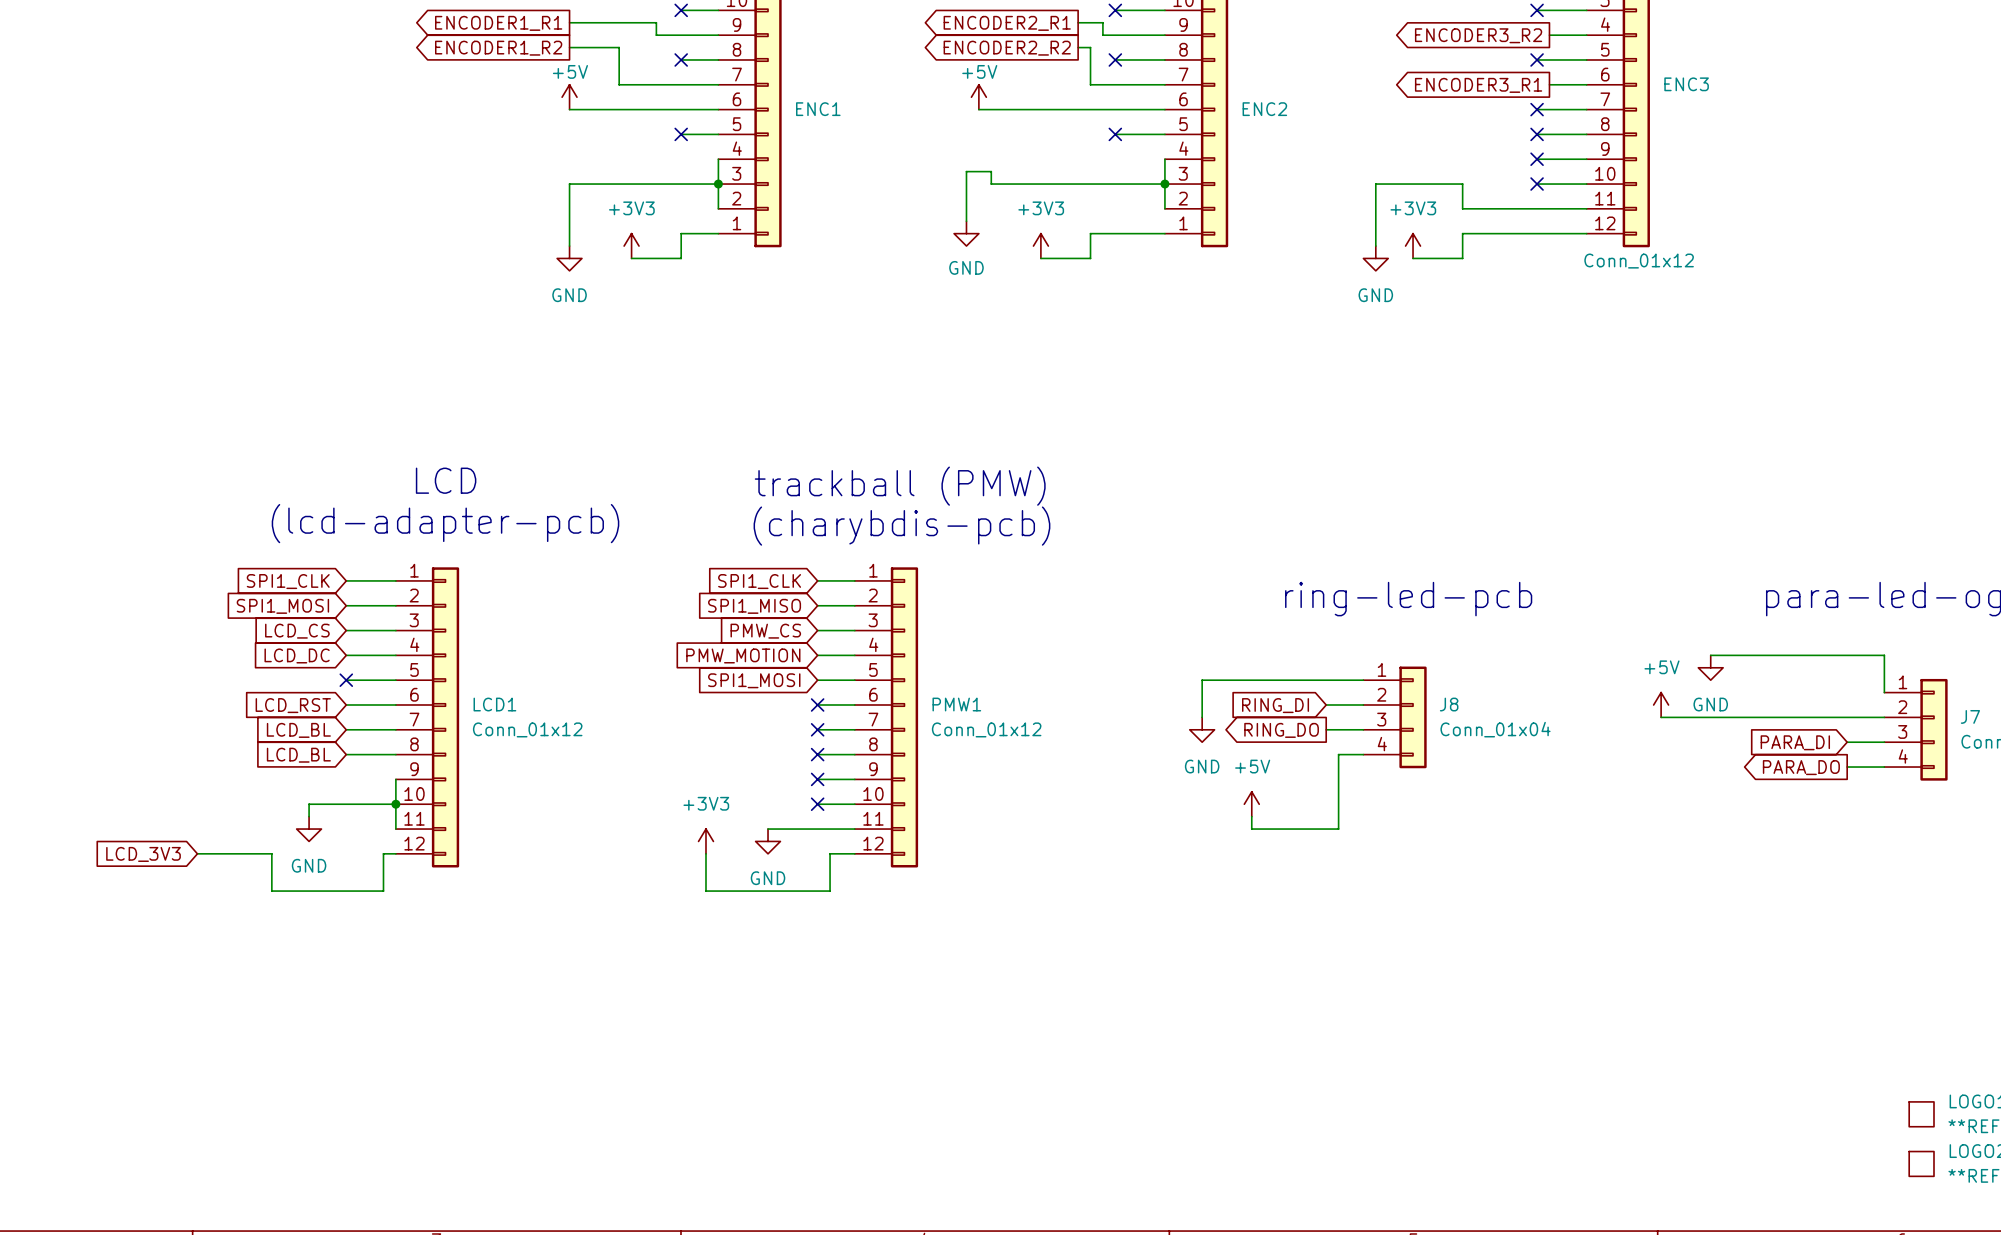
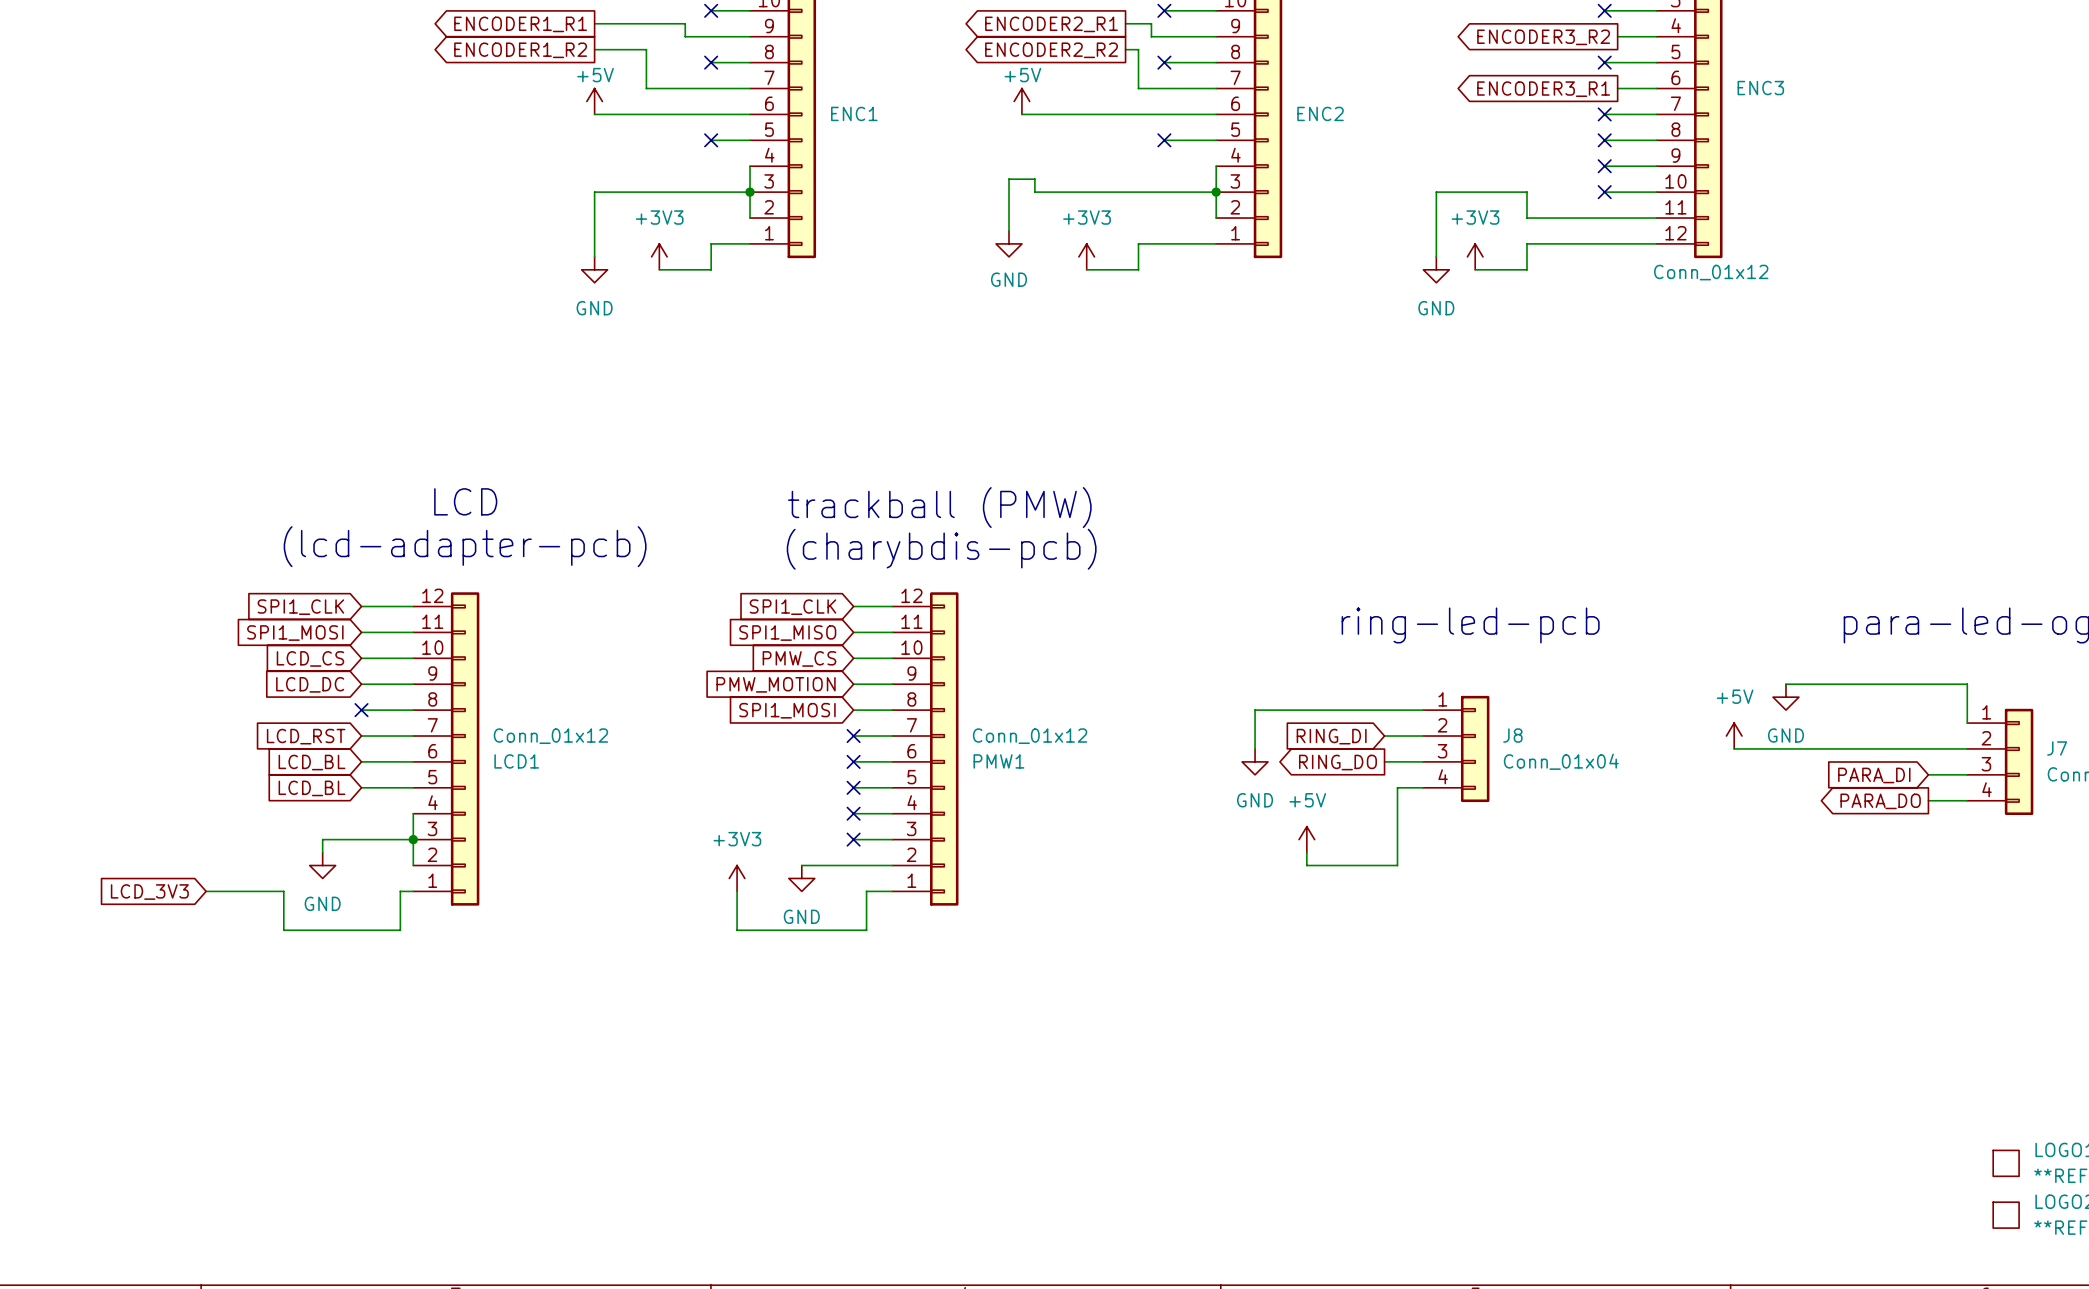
LCD1 flip: as is (445, 717) -> up-down (465, 748)
PMW1 flip: as is (904, 717) -> up-down (944, 748)

